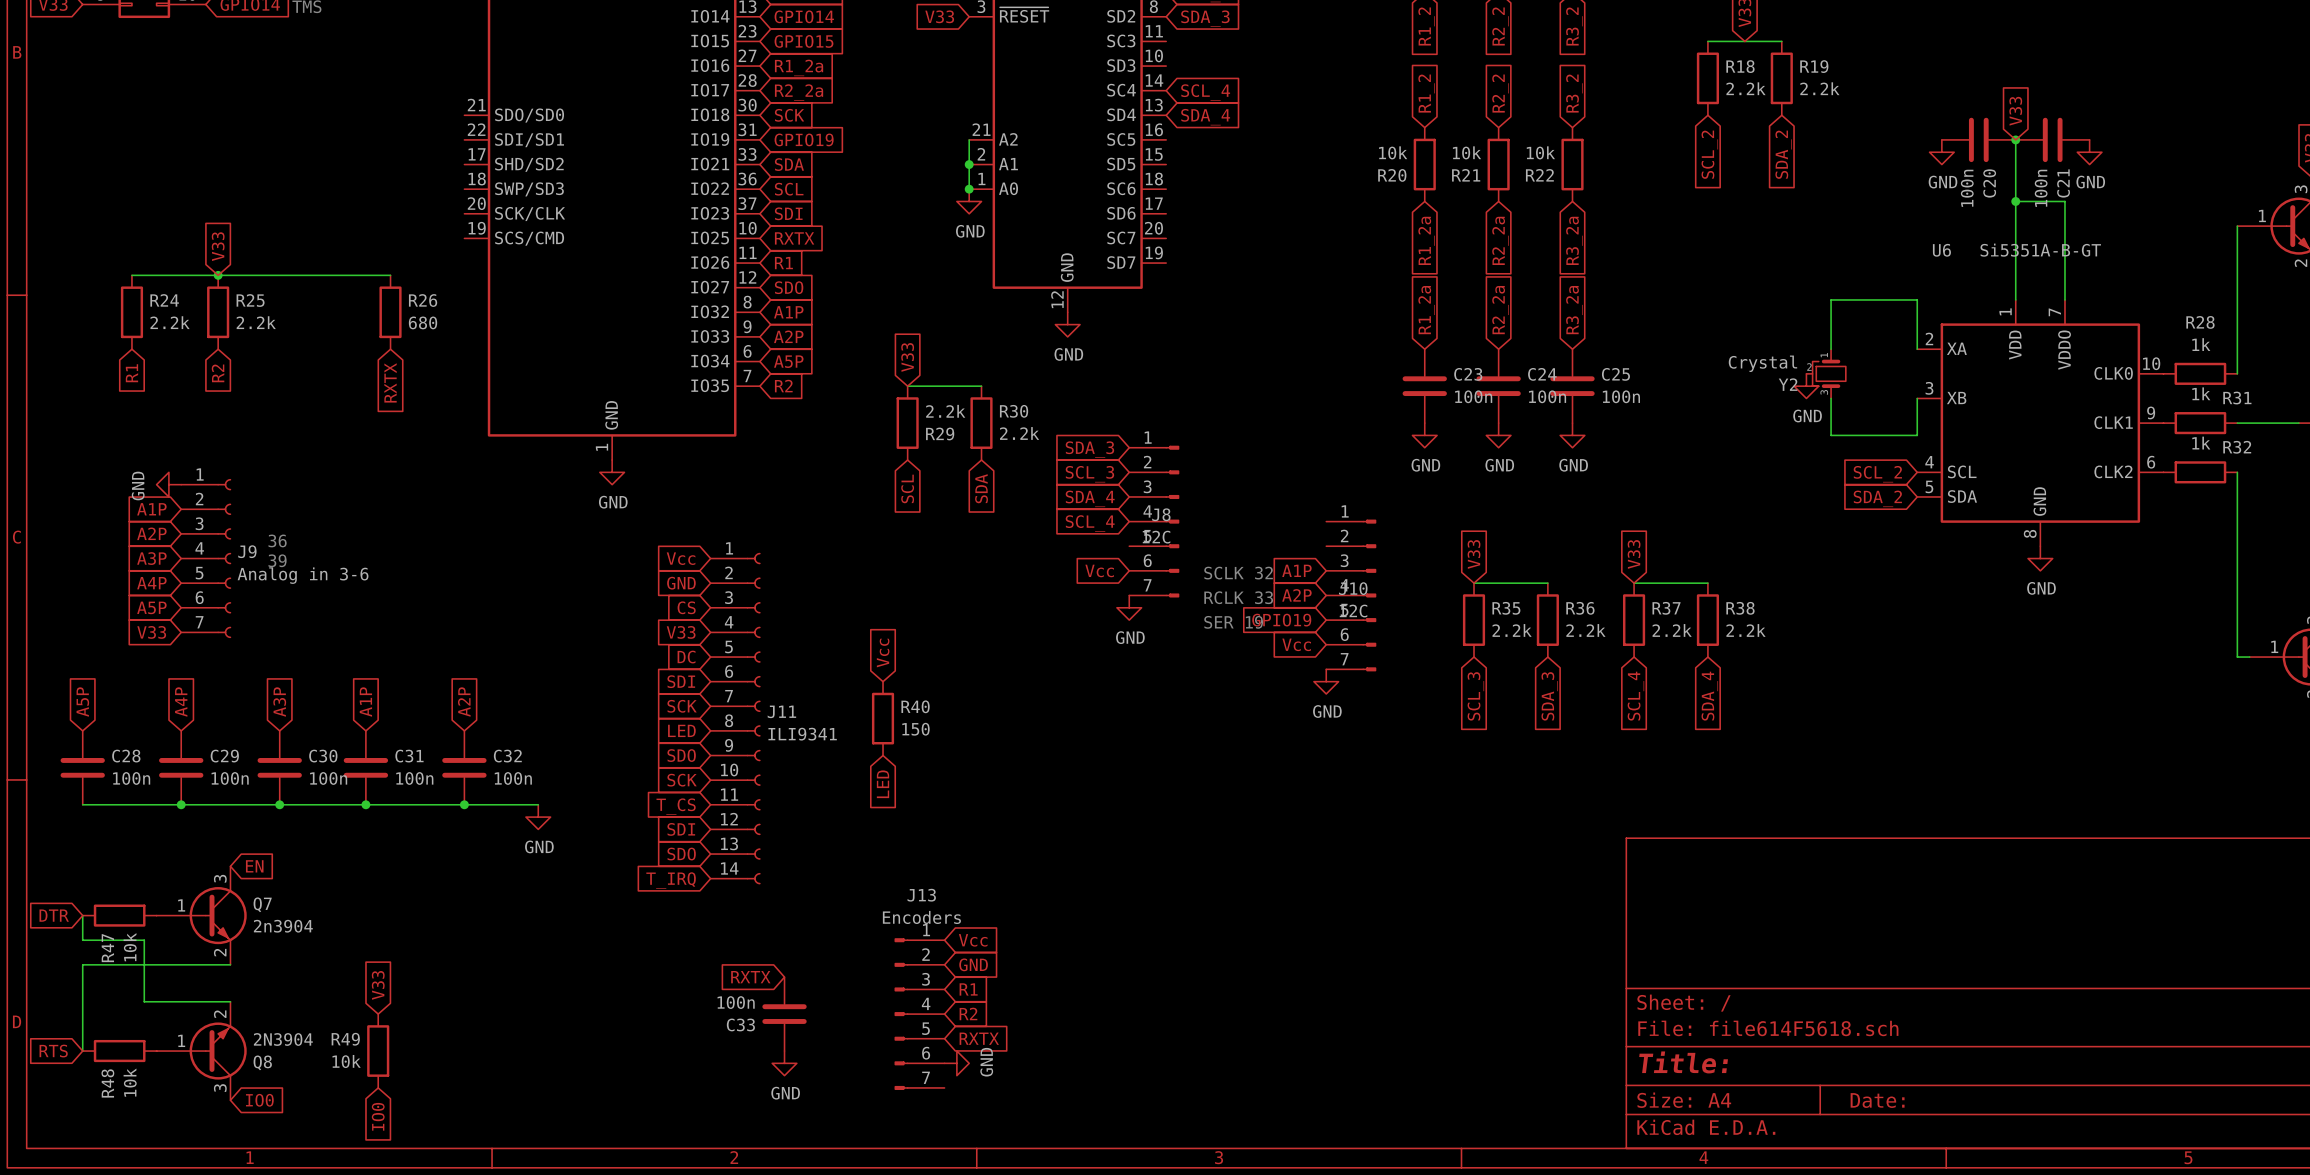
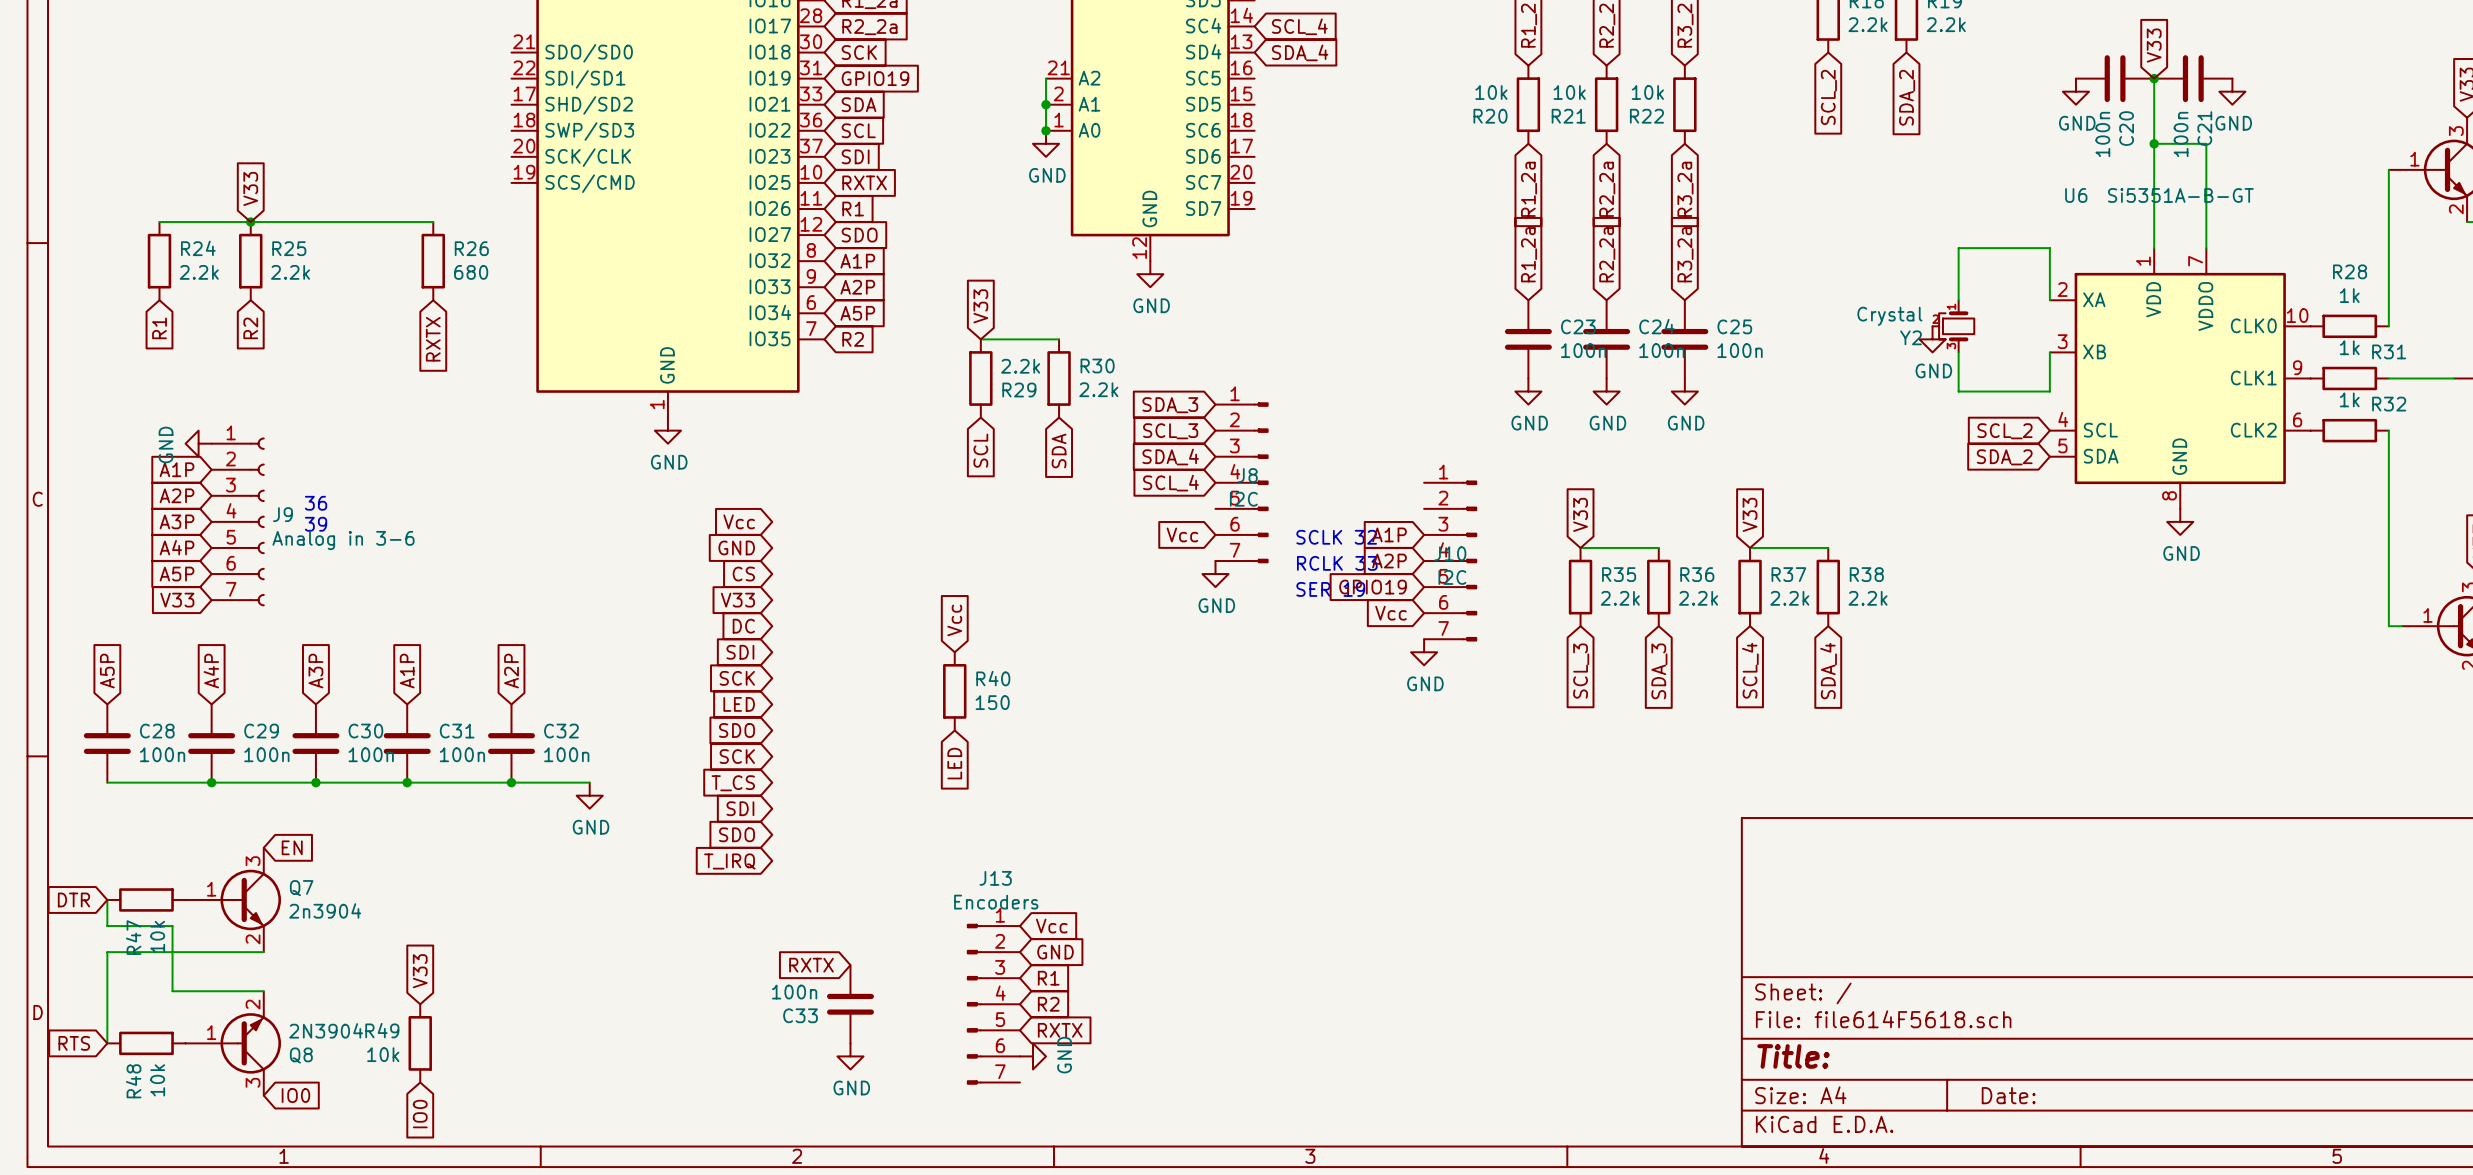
J11: ILI9341 (735, 718) -> none

